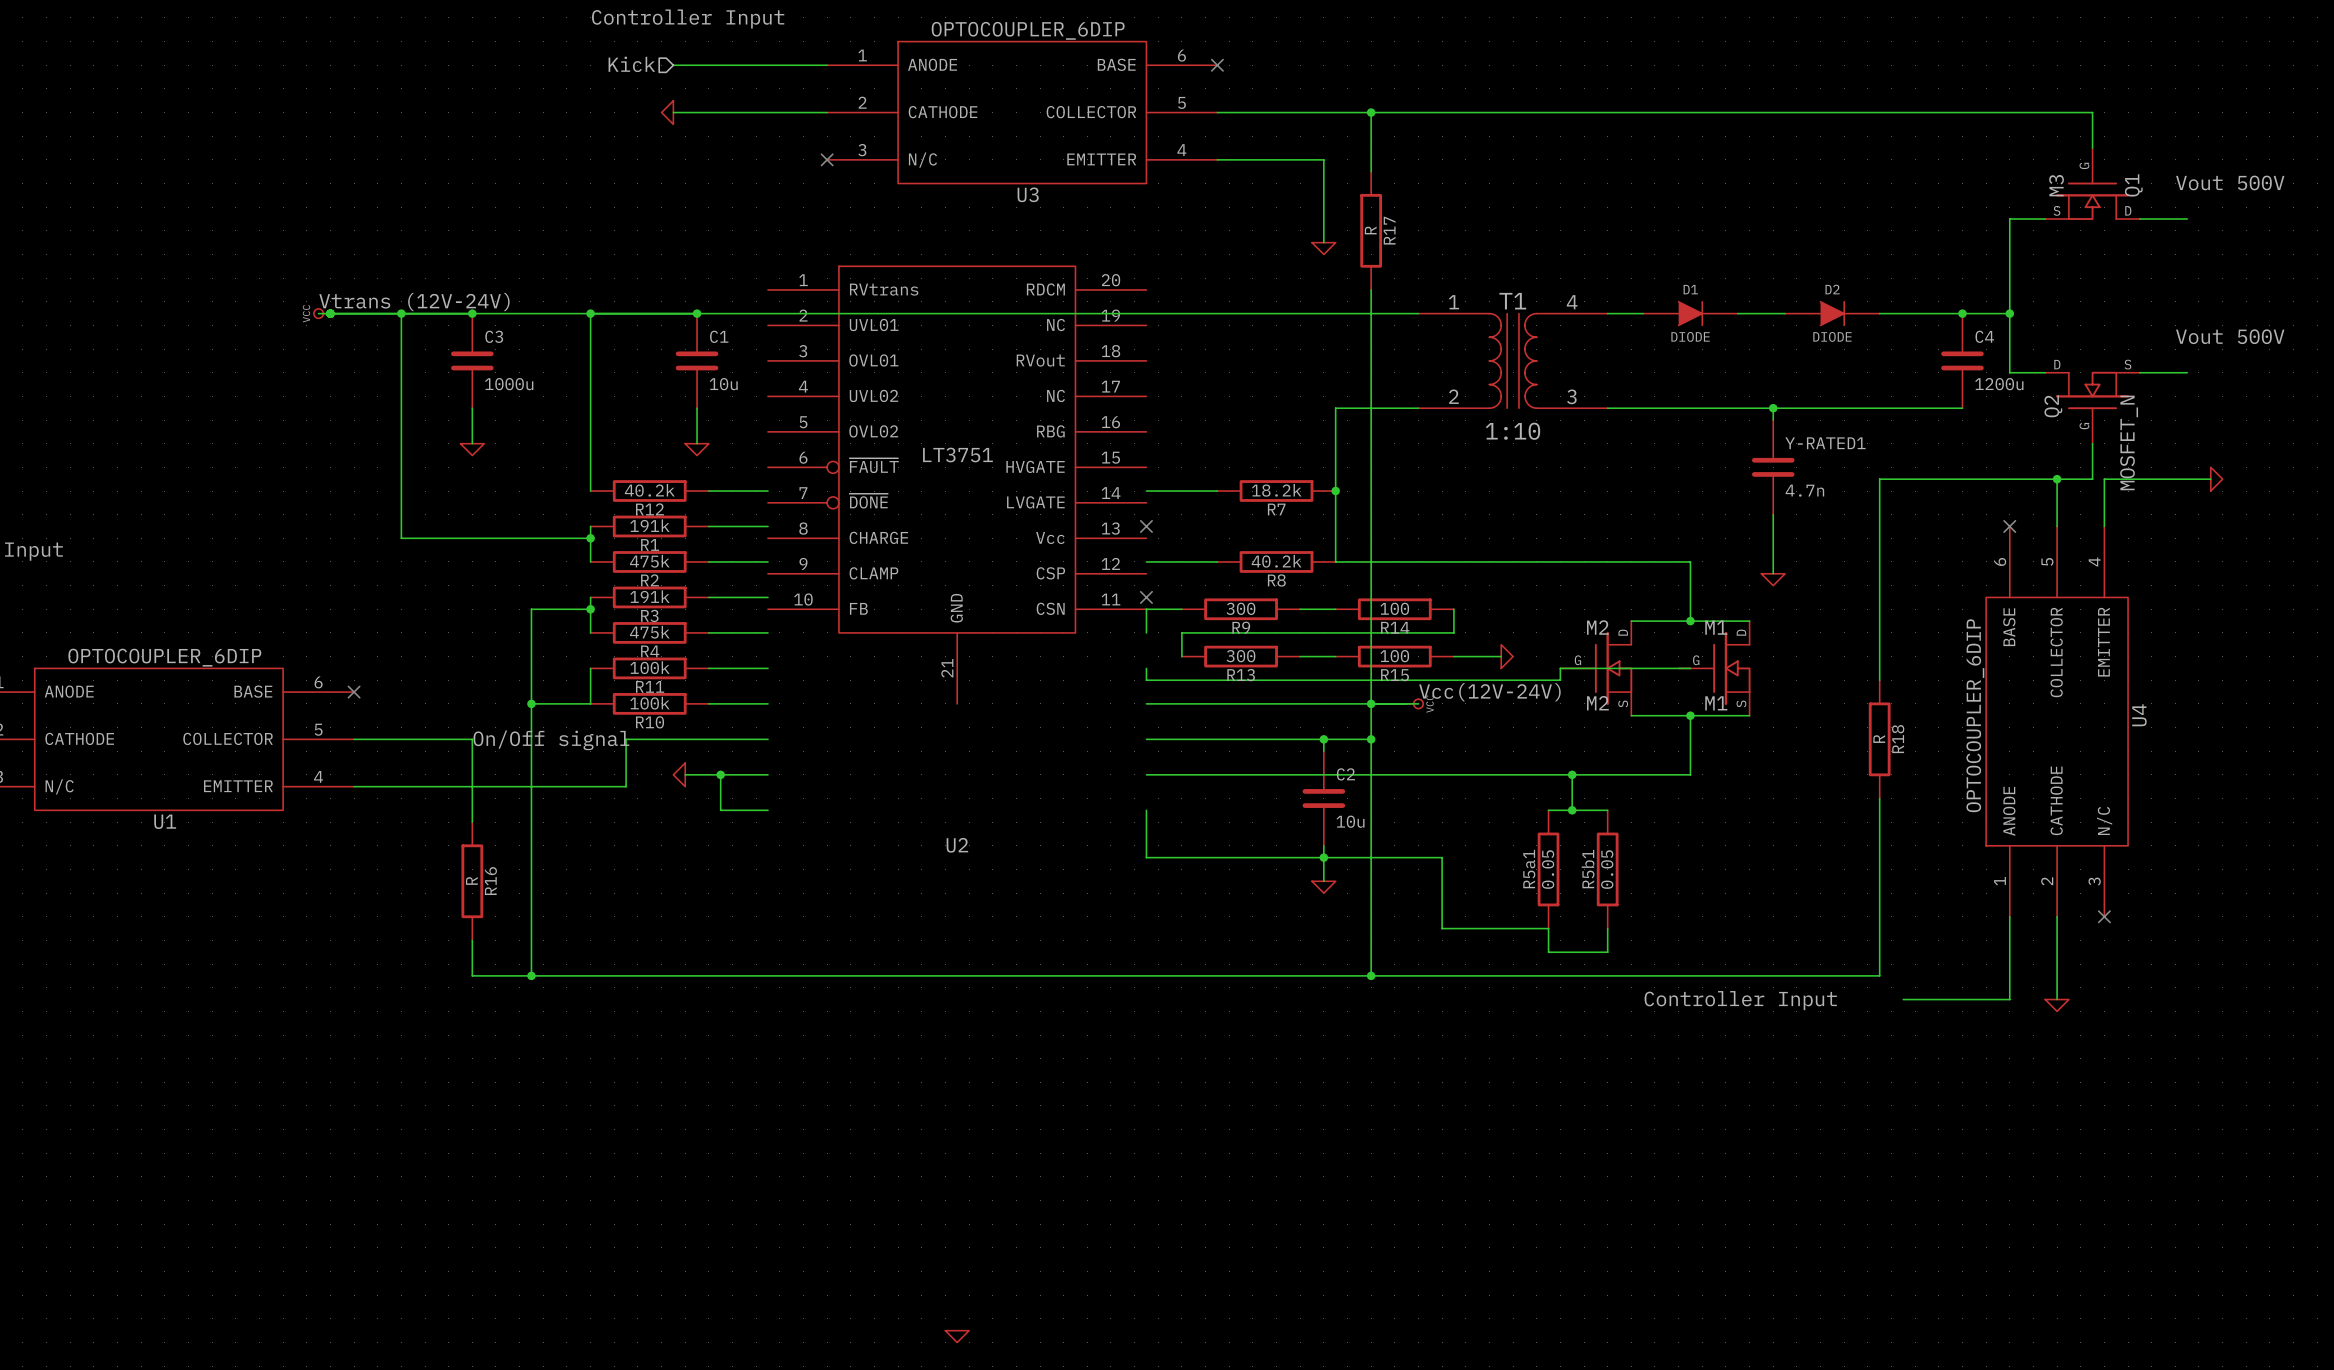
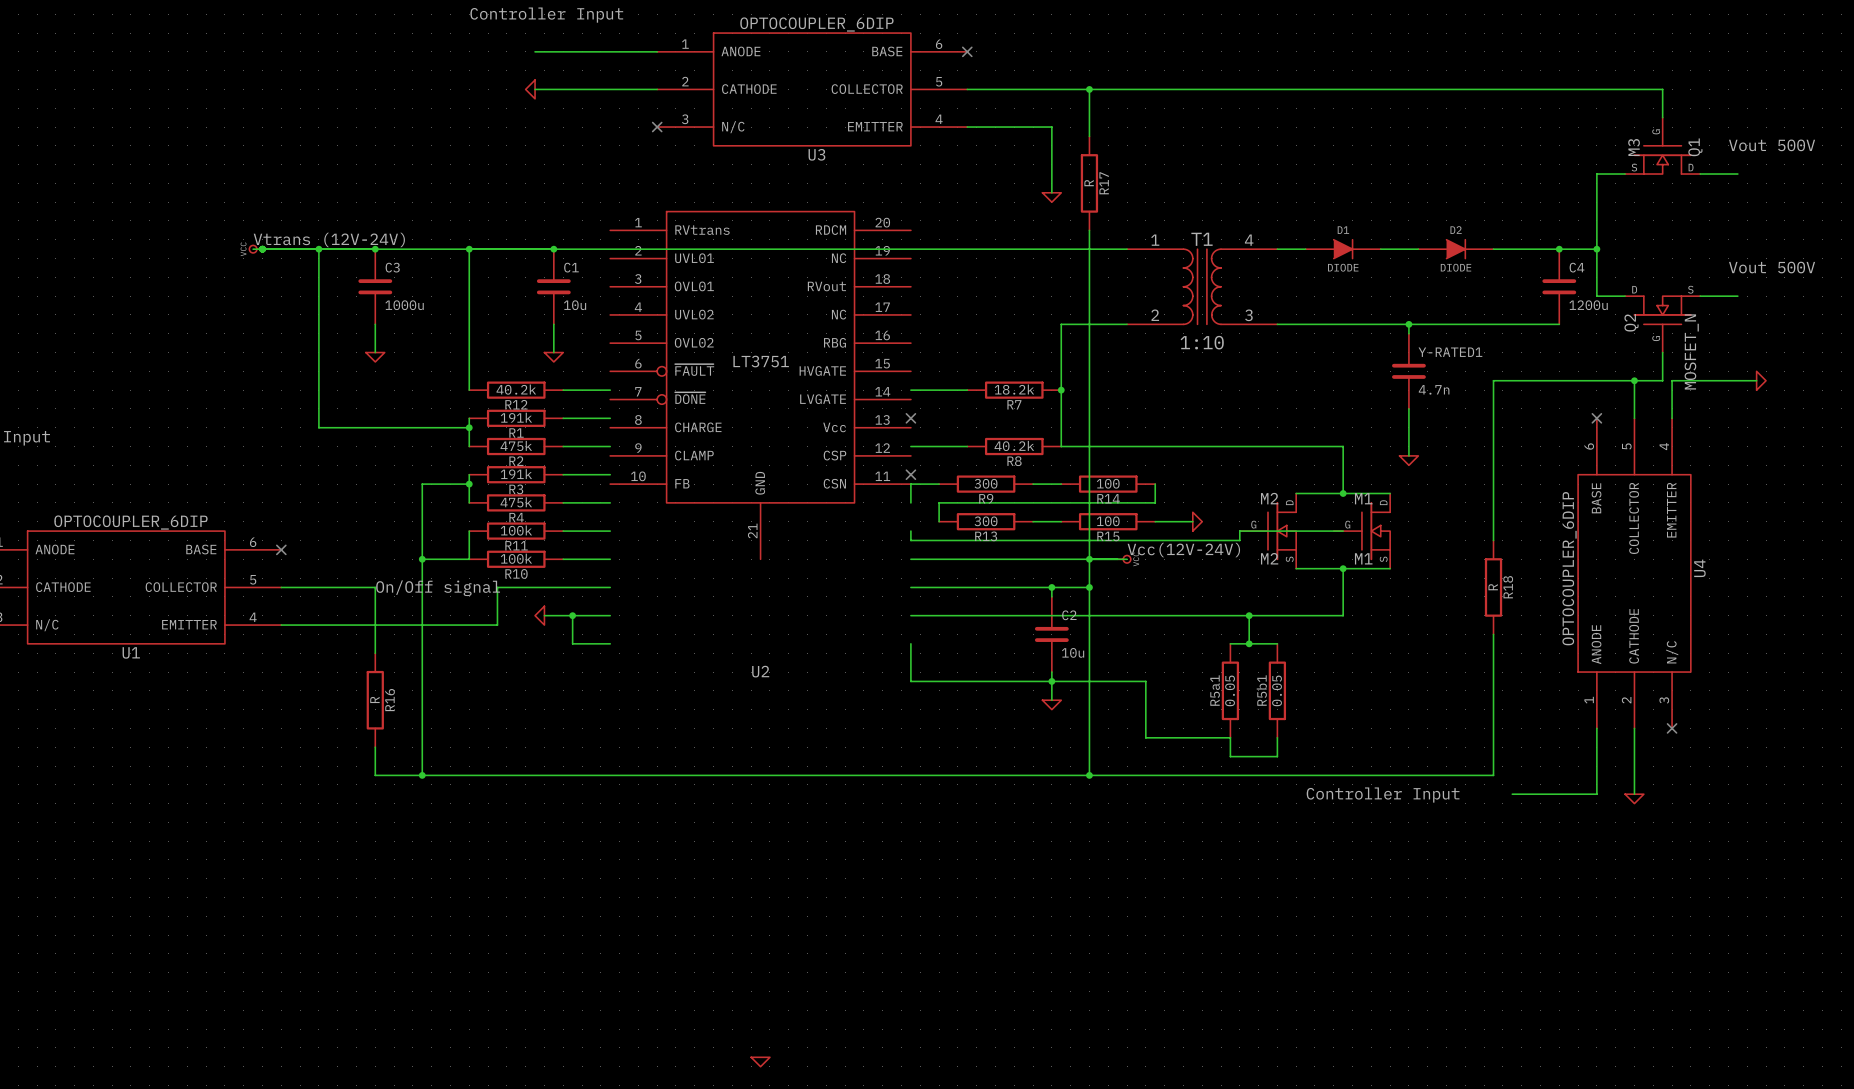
hierarchical label: Kick (631, 64) -> none

